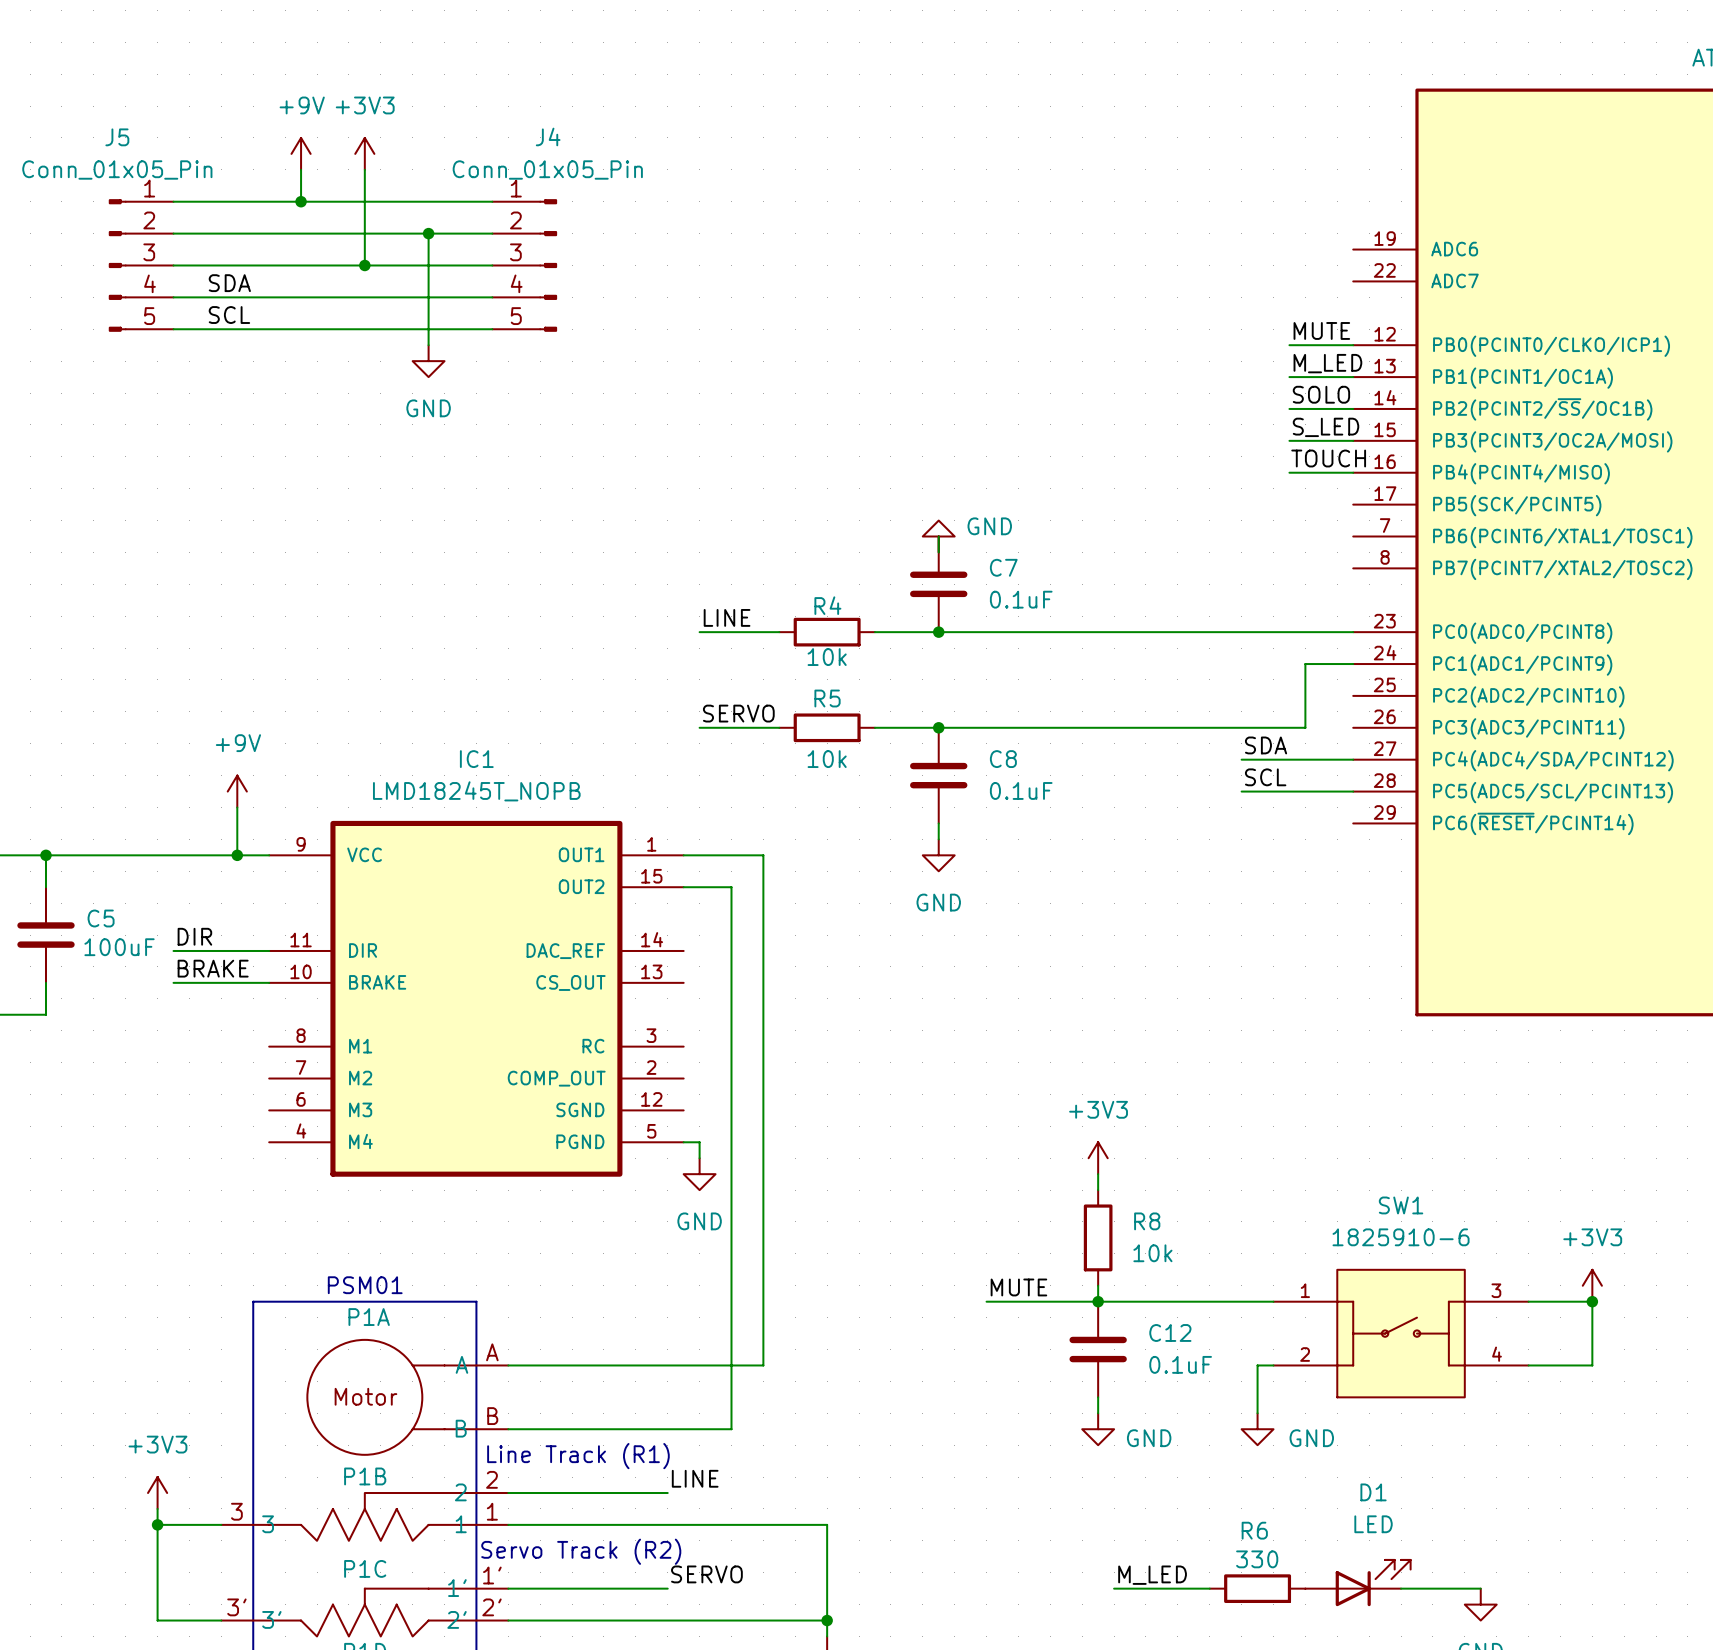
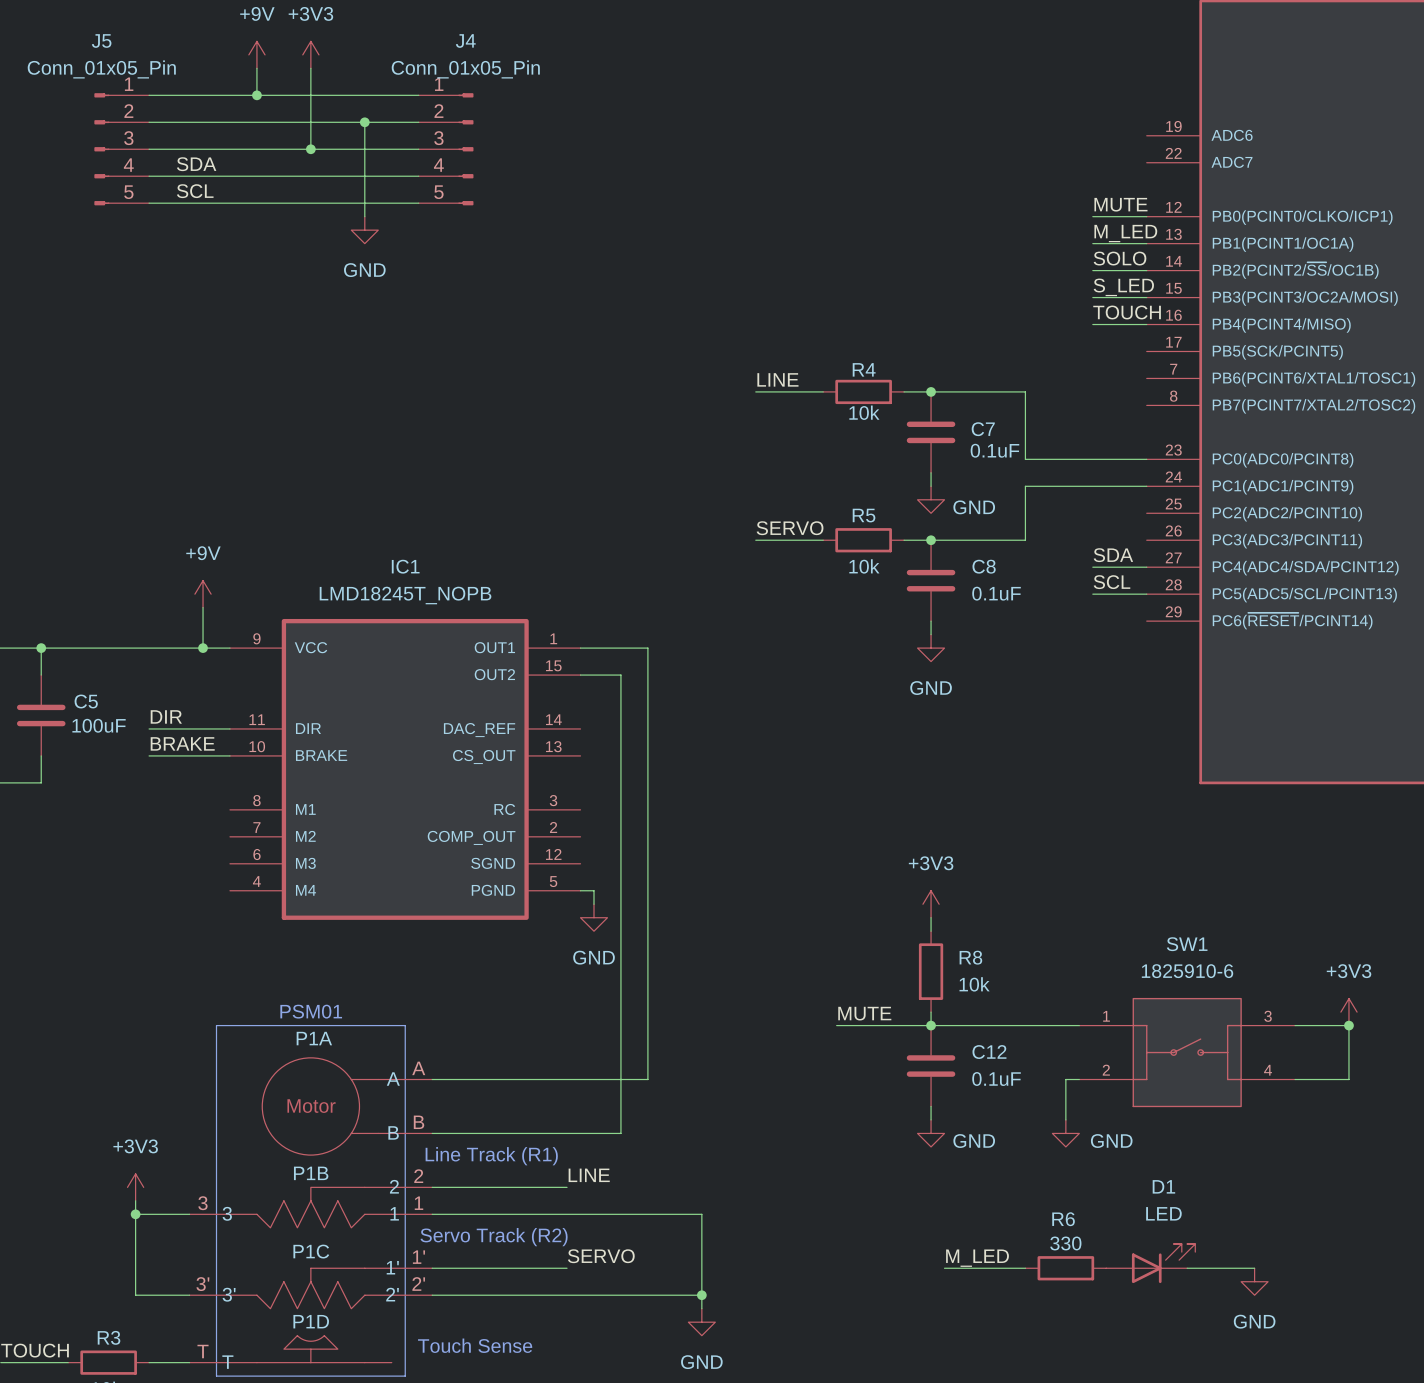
wire: (938, 536) (938, 552) -> (931, 472) (931, 486)
power symbol: GND (938, 536) -> none
junction: none -> (931, 391)
C7 name position: C7 (1003, 567) -> C7 (983, 429)
C7 position: (938, 584) -> (931, 432)
C7 value position: 0.1uF (1021, 599) -> 0.1uF (994, 450)
label position: LINE (727, 617) -> LINE (777, 379)
wire: (699, 632) (779, 632) -> (755, 391) (823, 391)
R4 position: (827, 632) -> (863, 391)
wire: (874, 632) (1209, 632) -> (904, 391) (1025, 391) (1025, 459)
junction: (938, 632) -> none
wire: (1305, 664) (1305, 727) (1209, 727) -> (1106, 486) (1025, 486) (1025, 540)
power symbol: none -> GND (931, 499)
label position: SERVO (738, 713) -> SERVO (790, 528)
wire: (699, 727) (779, 727) -> none
R5 position: (827, 727) -> (863, 540)
wire: (874, 727) (890, 727) -> none
junction: (938, 727) -> none
wire: (970, 727) (1066, 727) -> none
junction: none -> (931, 540)
label position: SDA (1266, 745) -> SDA (1113, 555)
wire: (1241, 759) (1289, 759) -> none
C8 position: (938, 775) -> (931, 580)
label position: SCL (1265, 777) -> SCL (1112, 582)
wire: (1241, 791) (1289, 791) -> none
wire: (938, 823) (938, 839) -> (931, 621) (931, 634)
power symbol: GND (938, 855) -> none
power symbol: none -> GND (931, 648)

